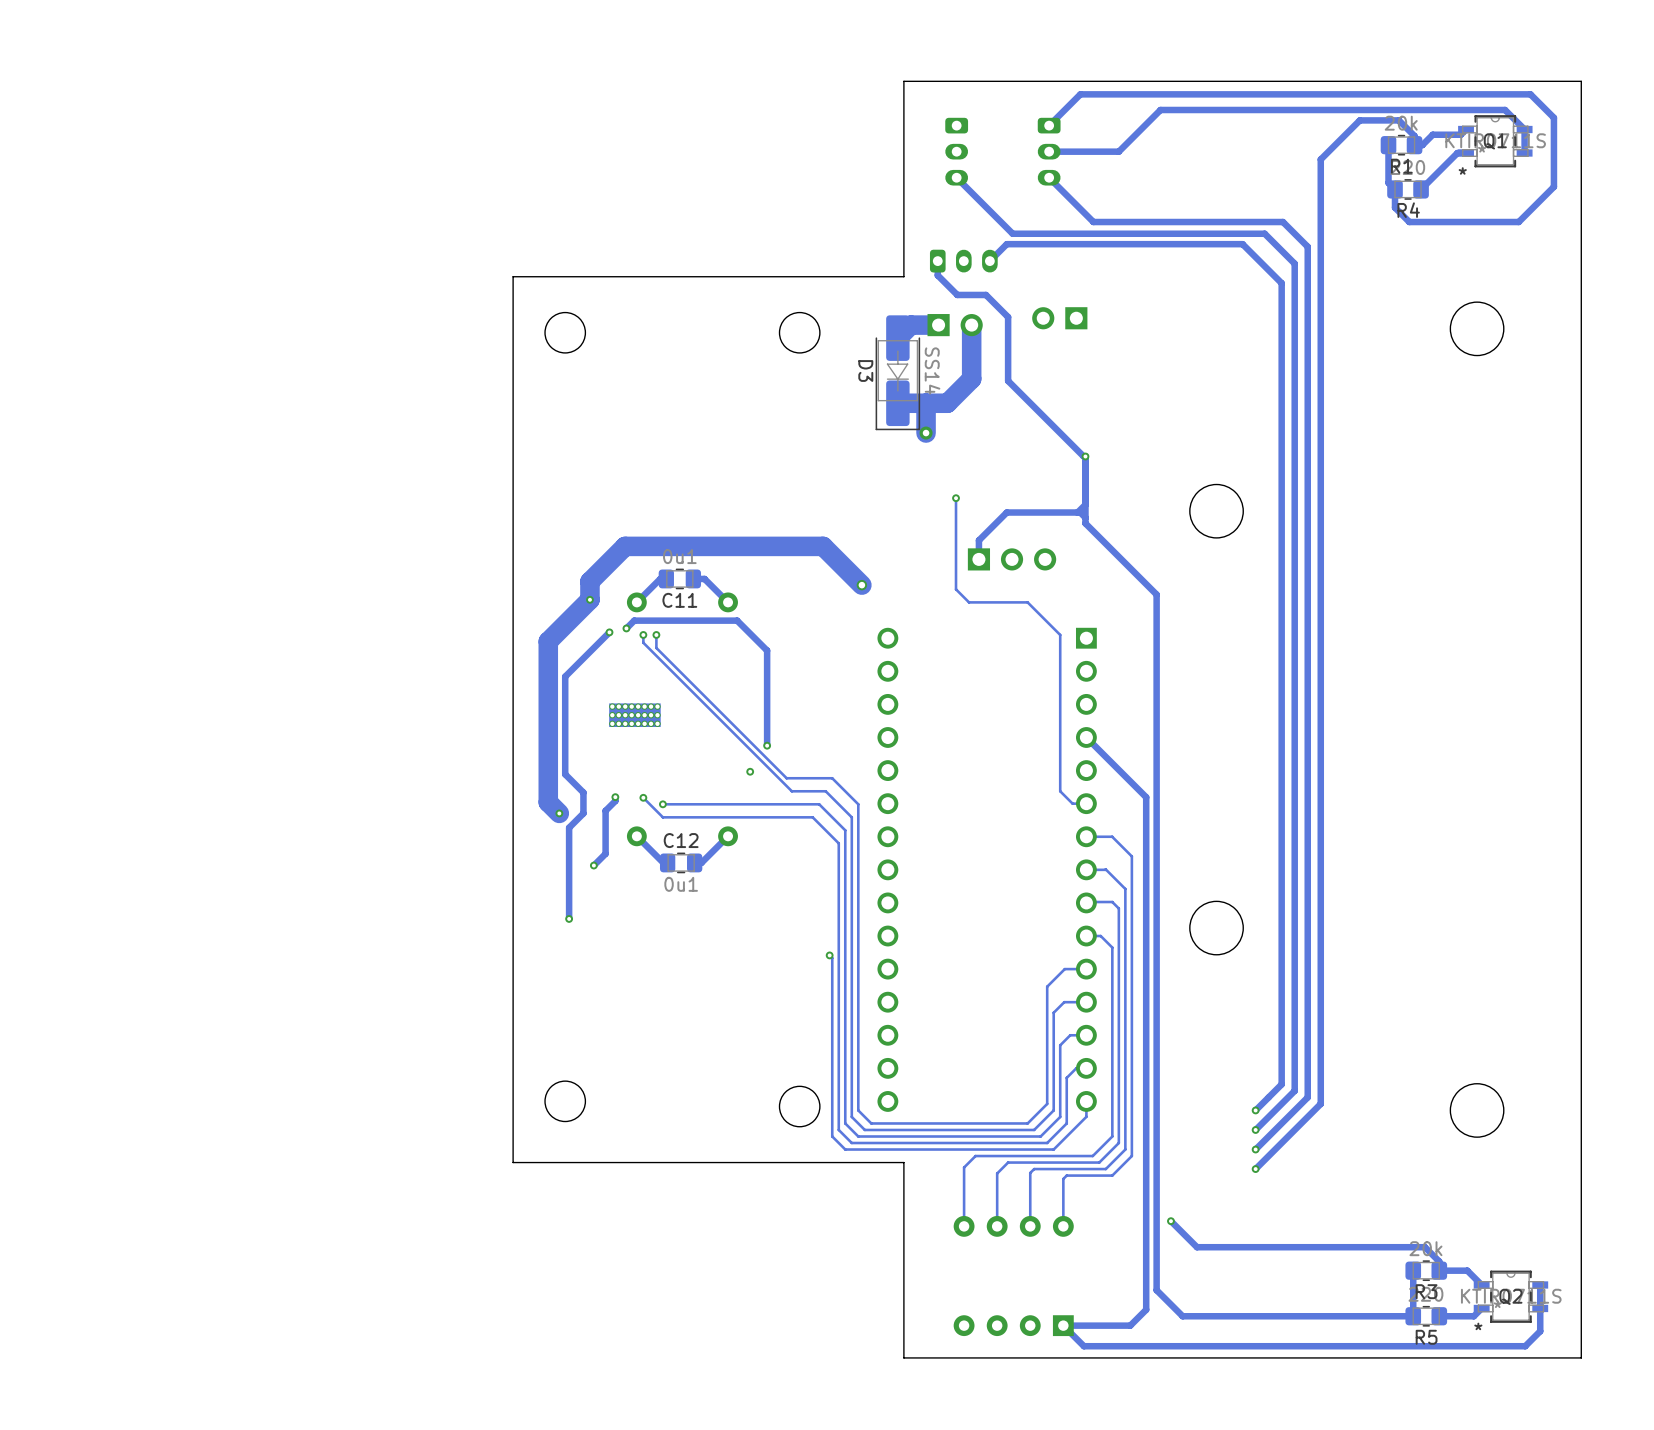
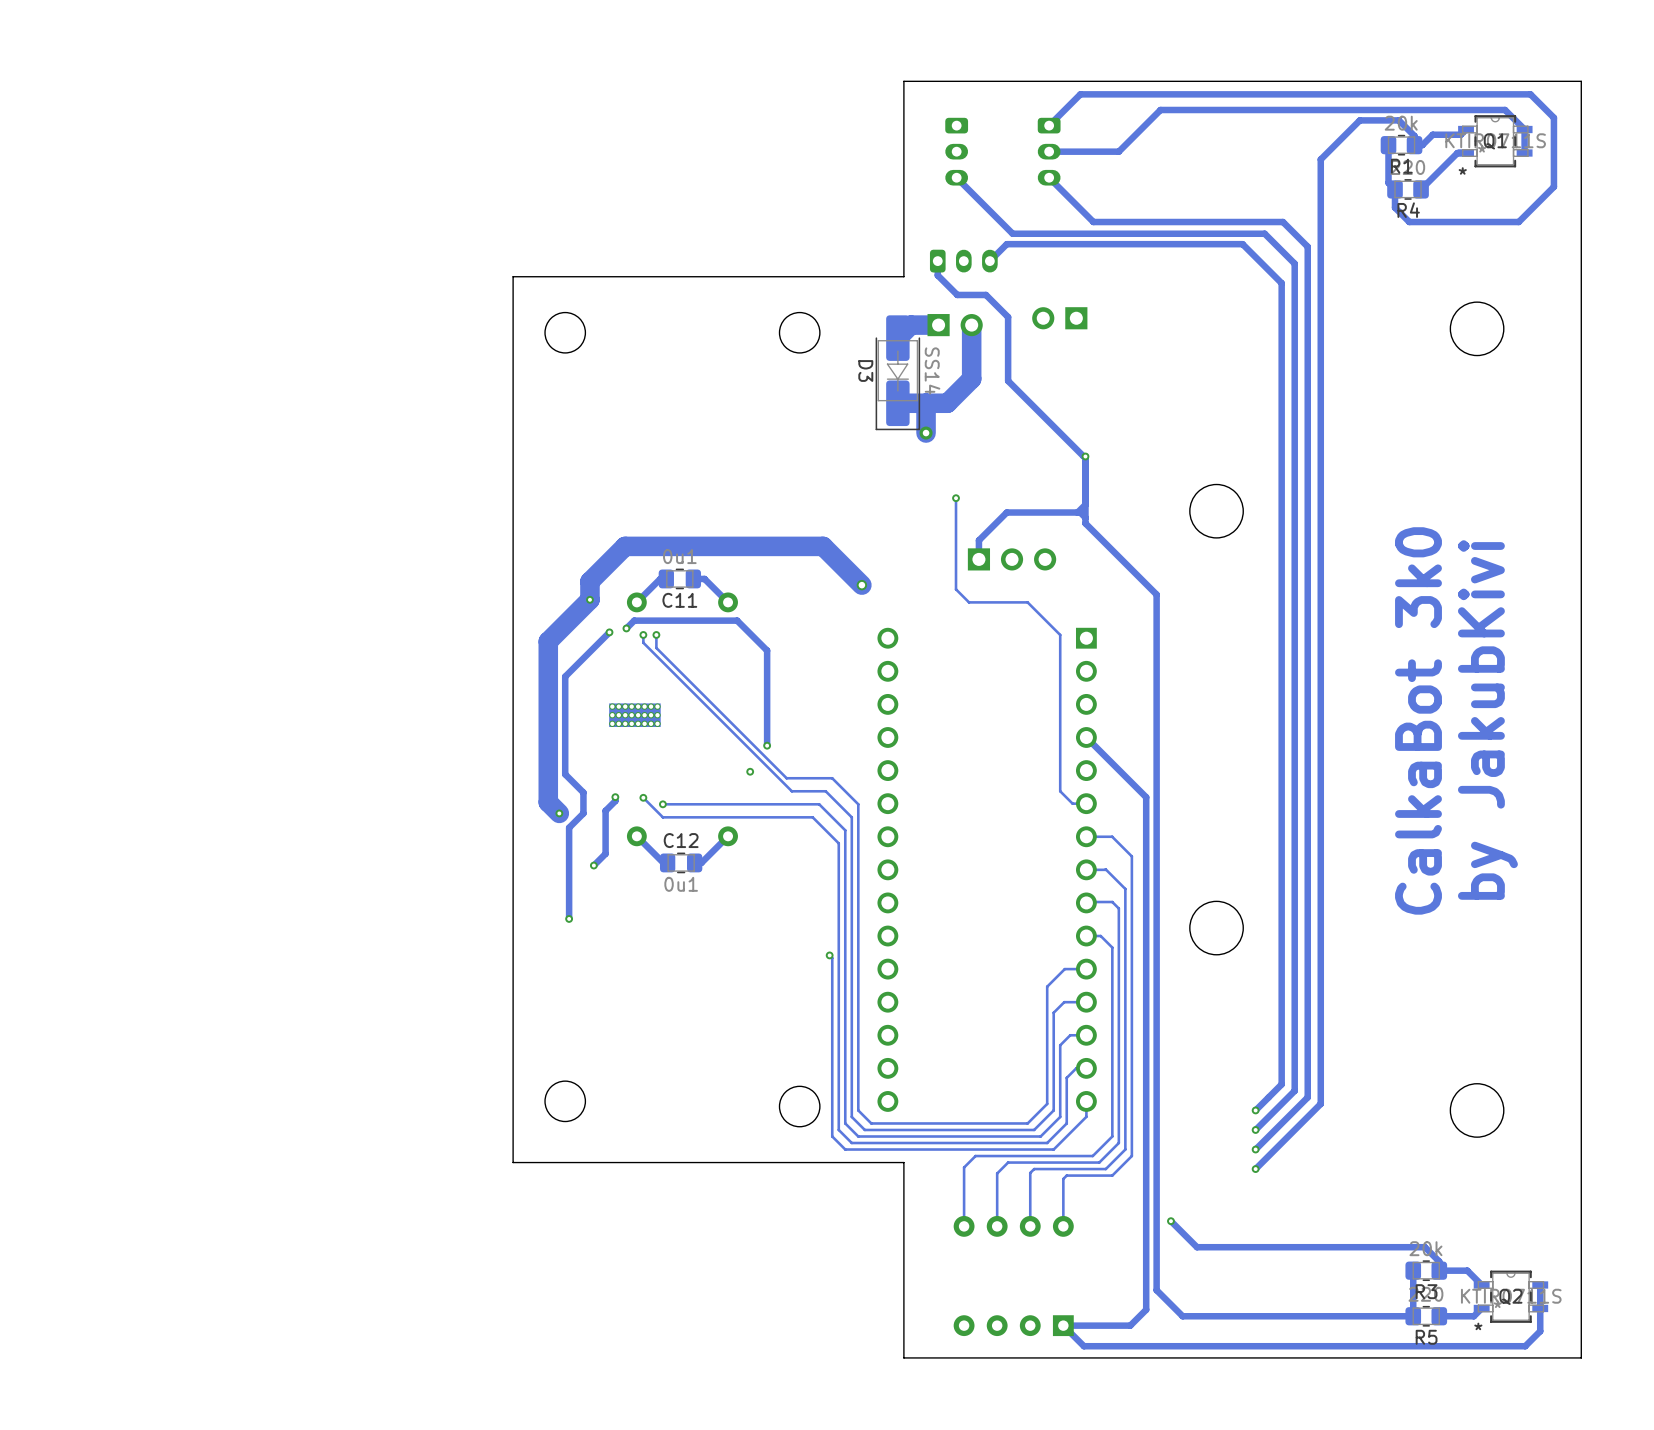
text: none -> CalkaBot 3k0 (1418, 720)
text: none -> by JakubKivi (1487, 720)

